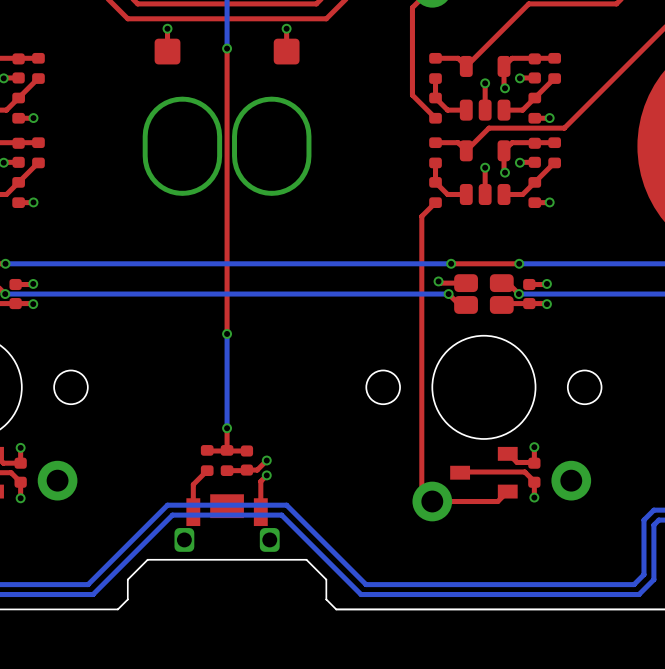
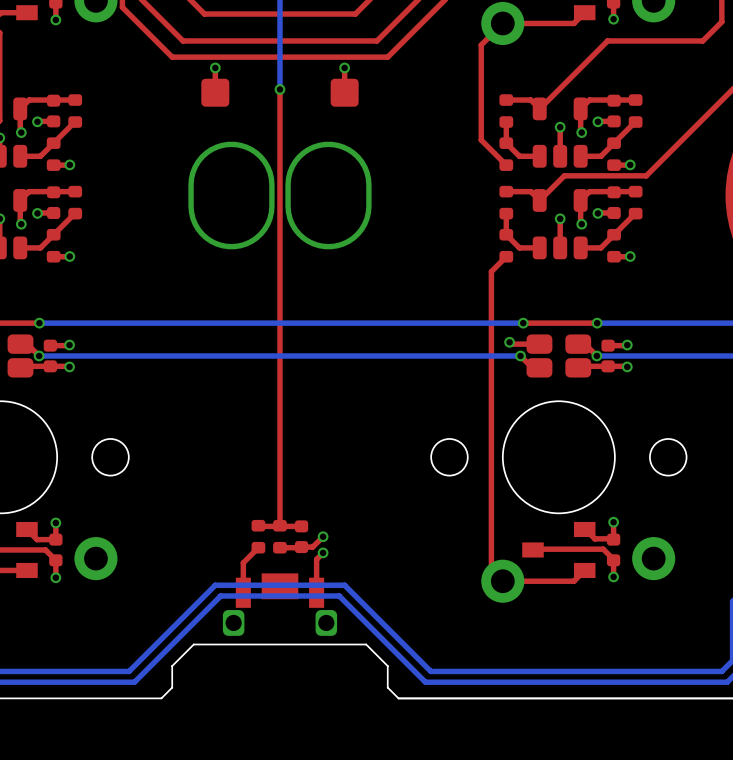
top track: none -> (279, 399) (279, 501)
bottom track: (227, 333) (227, 428) -> none
via: (227, 333) -> none
via: (227, 428) -> none

